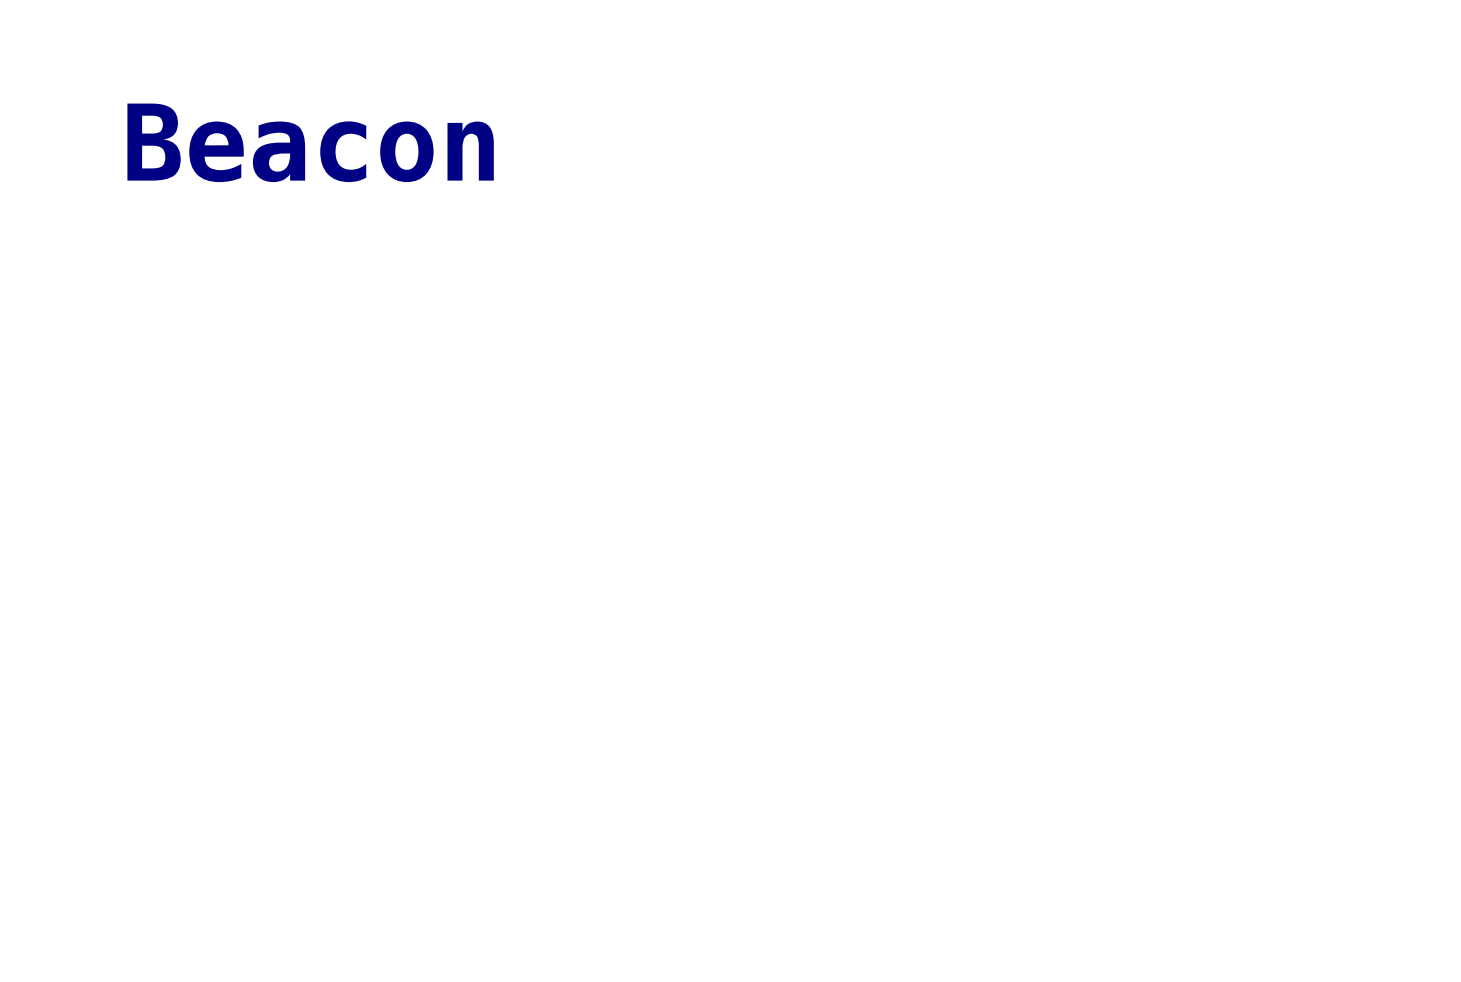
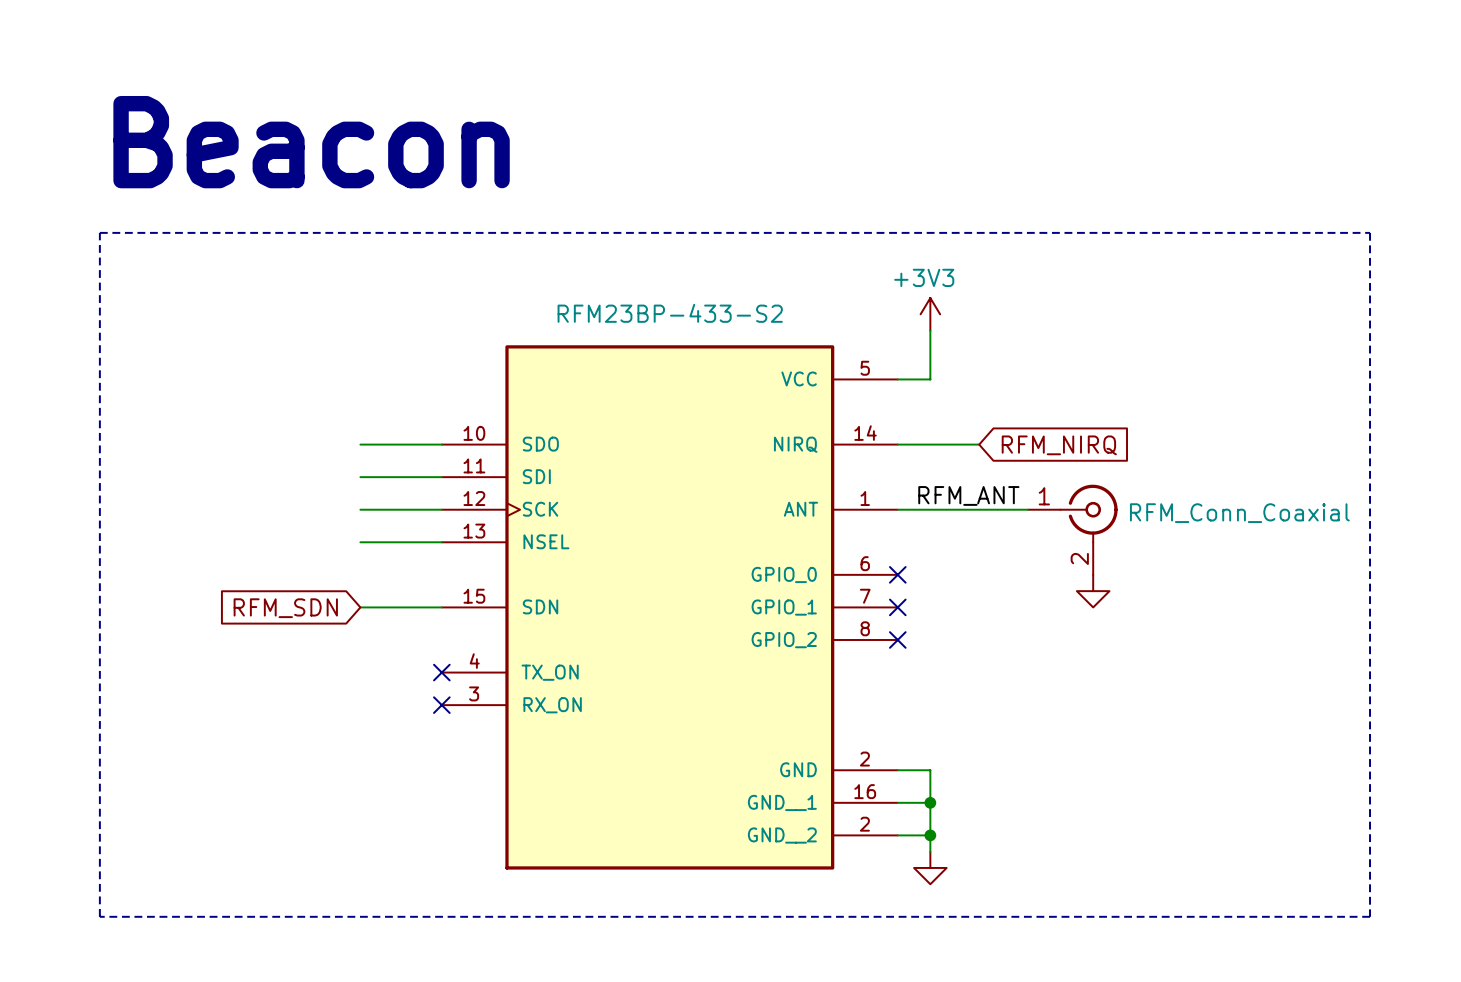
line: none -> (99, 232) (1370, 232) (1370, 916) (99, 916) (99, 232)
power symbol: none -> +3V3 (930, 314)
wire: none -> (930, 330) (930, 379) (897, 379)
wire: none -> (360, 444) (441, 444)
wire: none -> (897, 444) (979, 444)
global label: none -> RFM_NIRQ (1059, 445)
wire: none -> (360, 477) (441, 477)
label: none -> RFM_ANT (968, 495)
wire: none -> (360, 509) (441, 509)
wire: none -> (897, 509) (1028, 509)
part: none -> RFM_Conn_Coaxial (1072, 529)
wire: none -> (360, 542) (441, 542)
no-connect mark: none -> (897, 574)
power symbol: none -> (1093, 591)
wire: none -> (360, 607) (441, 607)
part: none -> RFM23BP-433-S2 (669, 607)
no-connect mark: none -> (897, 607)
global label: none -> RFM_SDN (285, 608)
no-connect mark: none -> (897, 639)
no-connect mark: none -> (441, 672)
no-connect mark: none -> (441, 705)
wire: none -> (897, 770) (930, 770) (930, 851)
wire: none -> (897, 802) (930, 802)
junction: none -> (930, 802)
wire: none -> (897, 835) (930, 835)
junction: none -> (930, 835)
power symbol: none -> (930, 867)

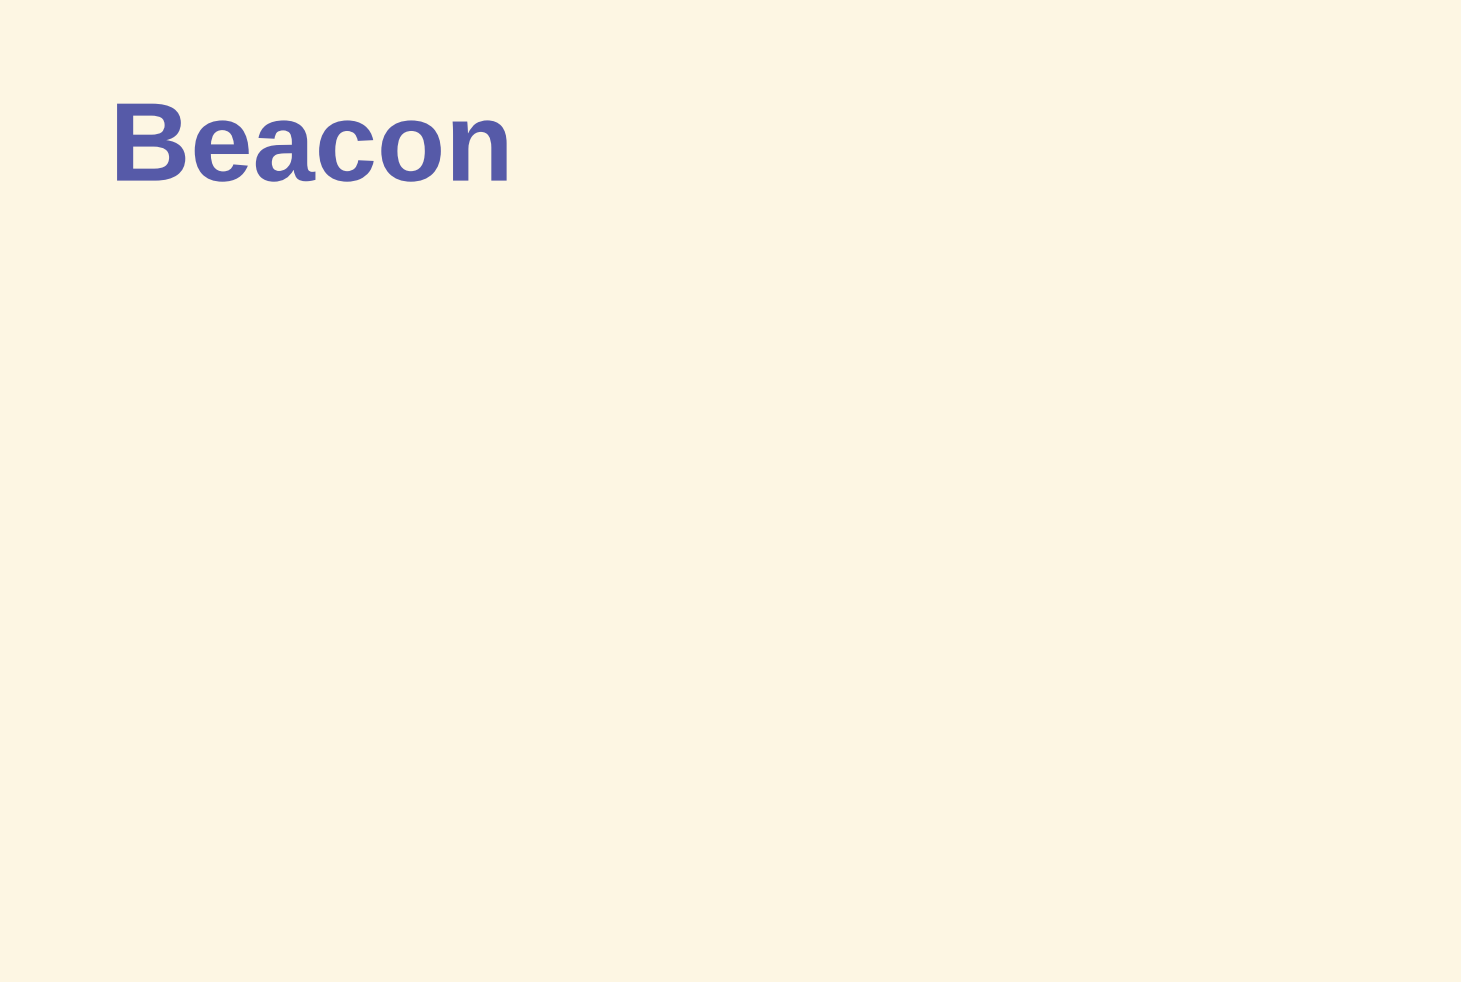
line: (99, 232) (1370, 232) (1370, 916) (99, 916) (99, 232) -> none
power symbol: +3V3 (930, 314) -> none
wire: (930, 330) (930, 379) (897, 379) -> none
wire: (360, 444) (441, 444) -> none
wire: (897, 444) (979, 444) -> none
global label: RFM_NIRQ (1059, 445) -> none
wire: (360, 477) (441, 477) -> none
label: RFM_ANT (968, 495) -> none
wire: (360, 509) (441, 509) -> none
wire: (897, 509) (1028, 509) -> none
part: RFM_Conn_Coaxial (1072, 529) -> none
wire: (360, 542) (441, 542) -> none
no-connect mark: (897, 574) -> none
power symbol: (1093, 591) -> none
wire: (360, 607) (441, 607) -> none
part: RFM23BP-433-S2 (669, 607) -> none
no-connect mark: (897, 607) -> none
global label: RFM_SDN (285, 608) -> none
no-connect mark: (897, 639) -> none
no-connect mark: (441, 672) -> none
no-connect mark: (441, 705) -> none
wire: (897, 770) (930, 770) (930, 851) -> none
wire: (897, 802) (930, 802) -> none
junction: (930, 802) -> none
wire: (897, 835) (930, 835) -> none
junction: (930, 835) -> none
power symbol: (930, 867) -> none

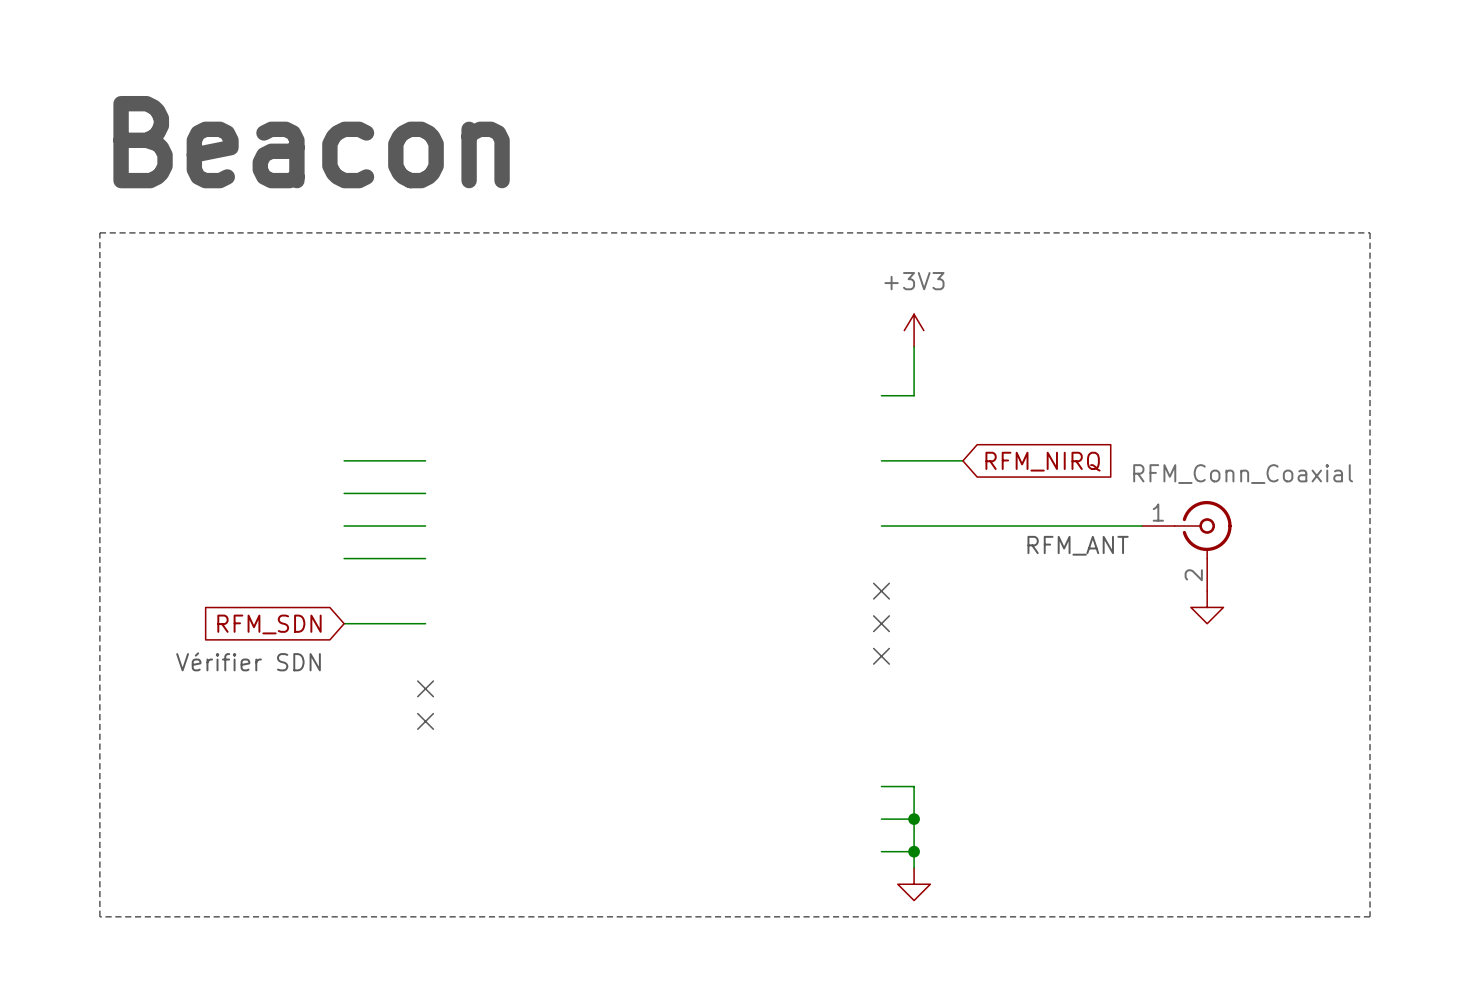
line: none -> (99, 232) (1370, 232) (1370, 916) (99, 916) (99, 232)
power symbol: none -> +3V3 (914, 330)
wire: none -> (914, 346) (914, 395) (881, 395)
wire: none -> (344, 460) (425, 460)
wire: none -> (881, 460) (962, 460)
global label: none -> RFM_NIRQ (1043, 461)
wire: none -> (344, 493) (425, 493)
wire: none -> (344, 526) (425, 526)
wire: none -> (881, 526) (1142, 526)
part: none -> RFM_Conn_Coaxial (1186, 546)
text: none -> RFM_ANT (1078, 545)
wire: none -> (344, 558) (425, 558)
no-connect mark: none -> (881, 591)
power symbol: none -> (1207, 607)
wire: none -> (344, 623) (425, 623)
no-connect mark: none -> (881, 623)
global label: none -> RFM_SDN (269, 624)
no-connect mark: none -> (881, 656)
text: none -> Vérifier SDN (248, 661)
no-connect mark: none -> (425, 688)
no-connect mark: none -> (425, 721)
wire: none -> (881, 786) (914, 786) (914, 867)
wire: none -> (881, 819) (914, 819)
junction: none -> (914, 819)
wire: none -> (881, 851) (914, 851)
junction: none -> (914, 851)
power symbol: none -> (914, 884)

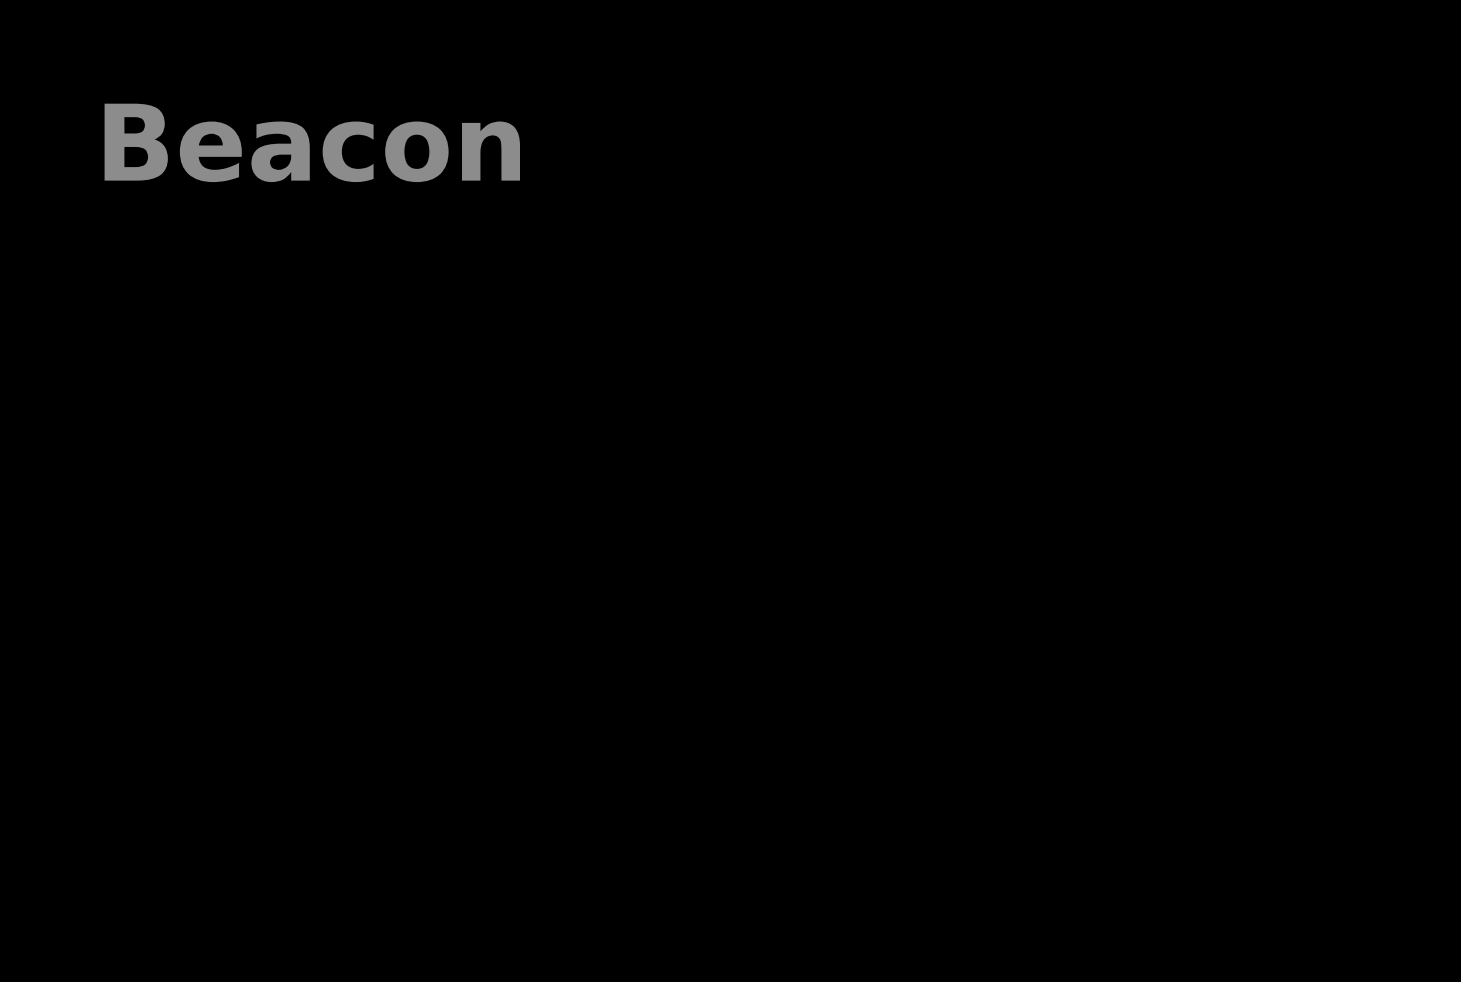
line: (99, 232) (1370, 232) (1370, 916) (99, 916) (99, 232) -> none
power symbol: +3V3 (914, 330) -> none
wire: (914, 346) (914, 395) (881, 395) -> none
wire: (344, 460) (425, 460) -> none
wire: (881, 460) (962, 460) -> none
global label: RFM_NIRQ (1043, 461) -> none
wire: (344, 493) (425, 493) -> none
wire: (344, 526) (425, 526) -> none
wire: (881, 526) (1142, 526) -> none
text: RFM_ANT (1078, 545) -> none
part: RFM_Conn_Coaxial (1186, 546) -> none
wire: (344, 558) (425, 558) -> none
no-connect mark: (881, 591) -> none
power symbol: (1207, 607) -> none
wire: (344, 623) (425, 623) -> none
no-connect mark: (881, 623) -> none
global label: RFM_SDN (269, 624) -> none
no-connect mark: (881, 656) -> none
text: Vérifier SDN (248, 661) -> none
no-connect mark: (425, 688) -> none
no-connect mark: (425, 721) -> none
wire: (881, 786) (914, 786) (914, 867) -> none
wire: (881, 819) (914, 819) -> none
junction: (914, 819) -> none
wire: (881, 851) (914, 851) -> none
junction: (914, 851) -> none
power symbol: (914, 884) -> none

